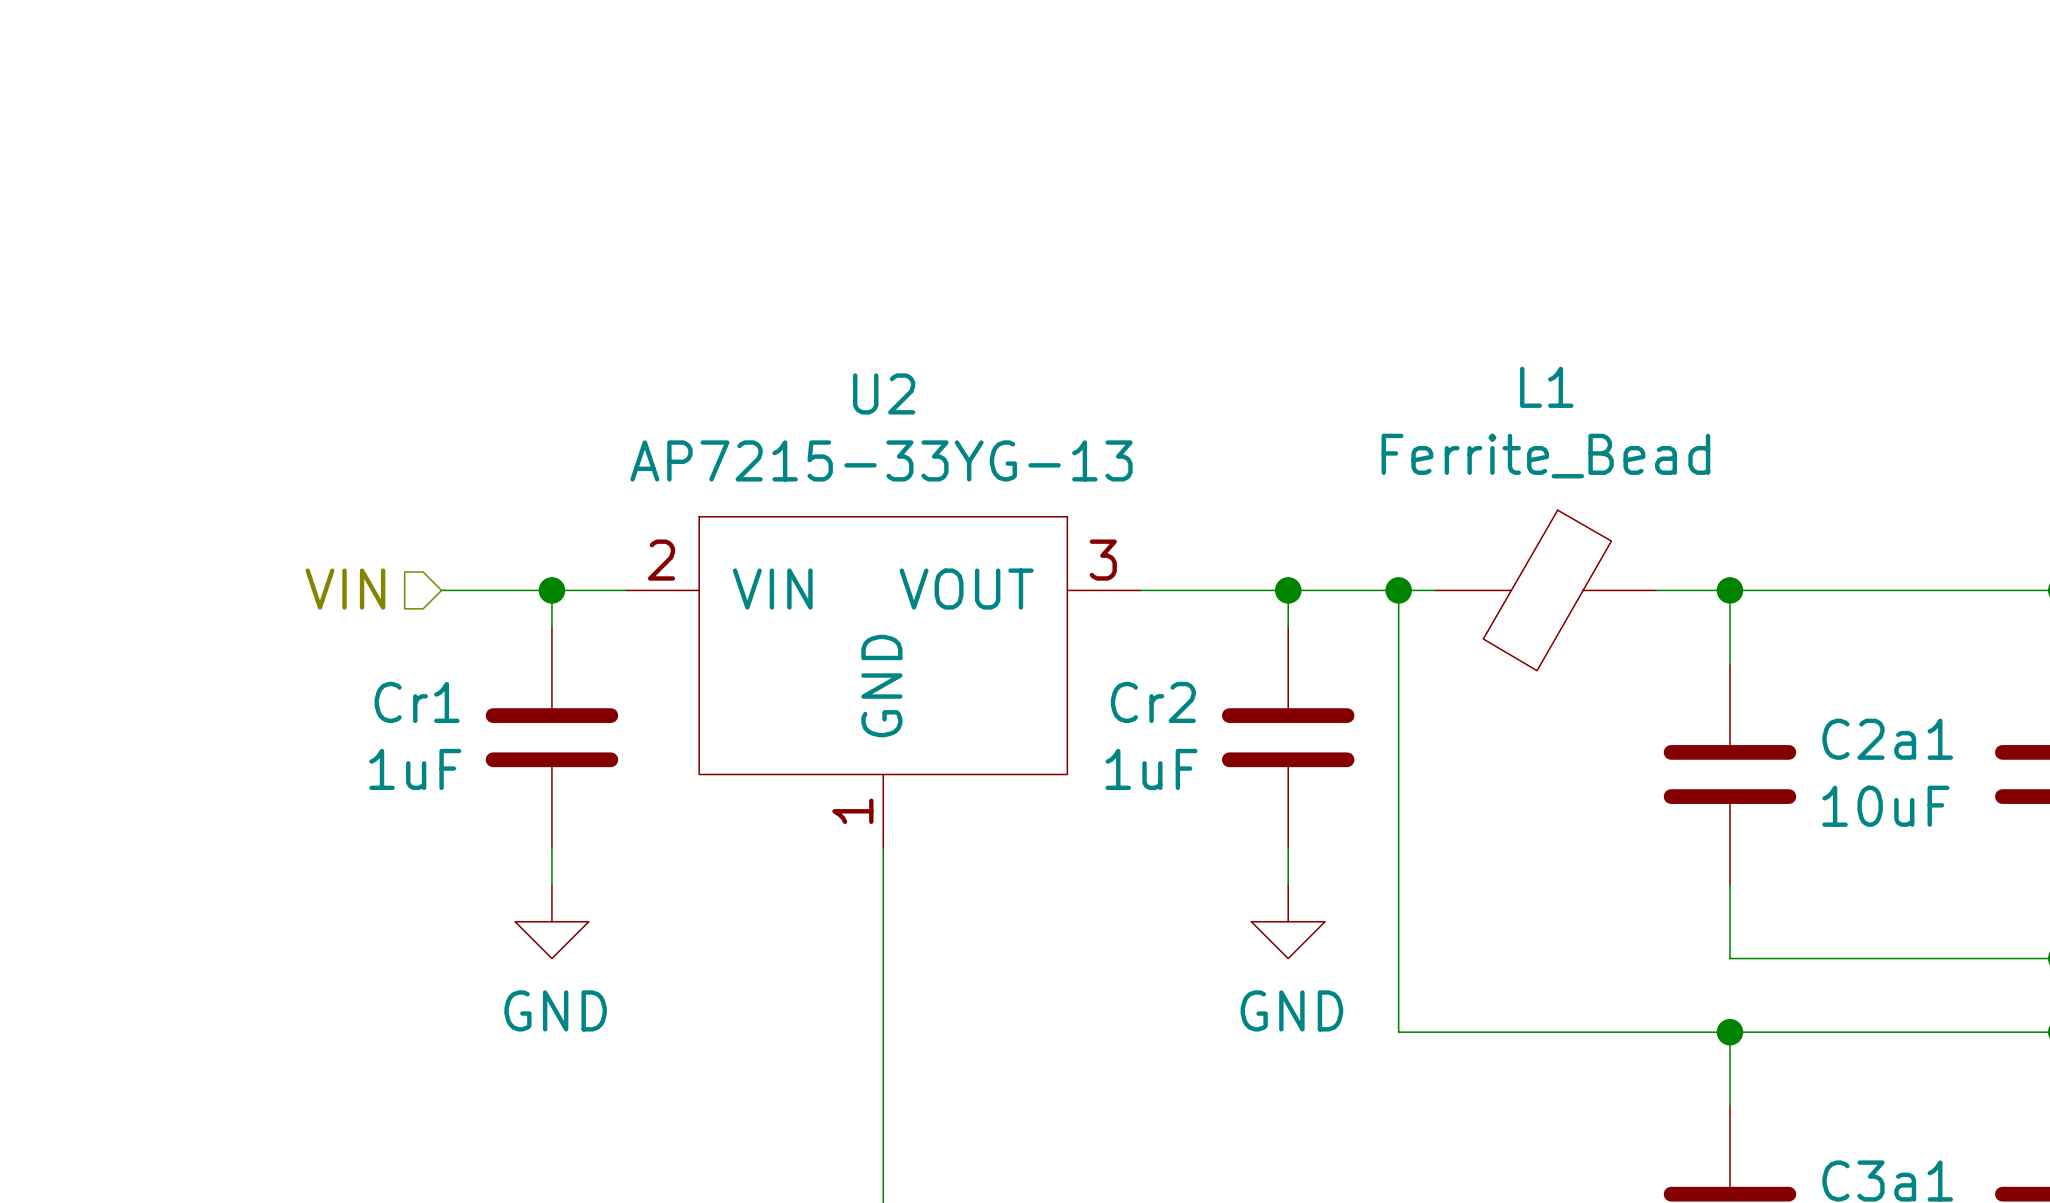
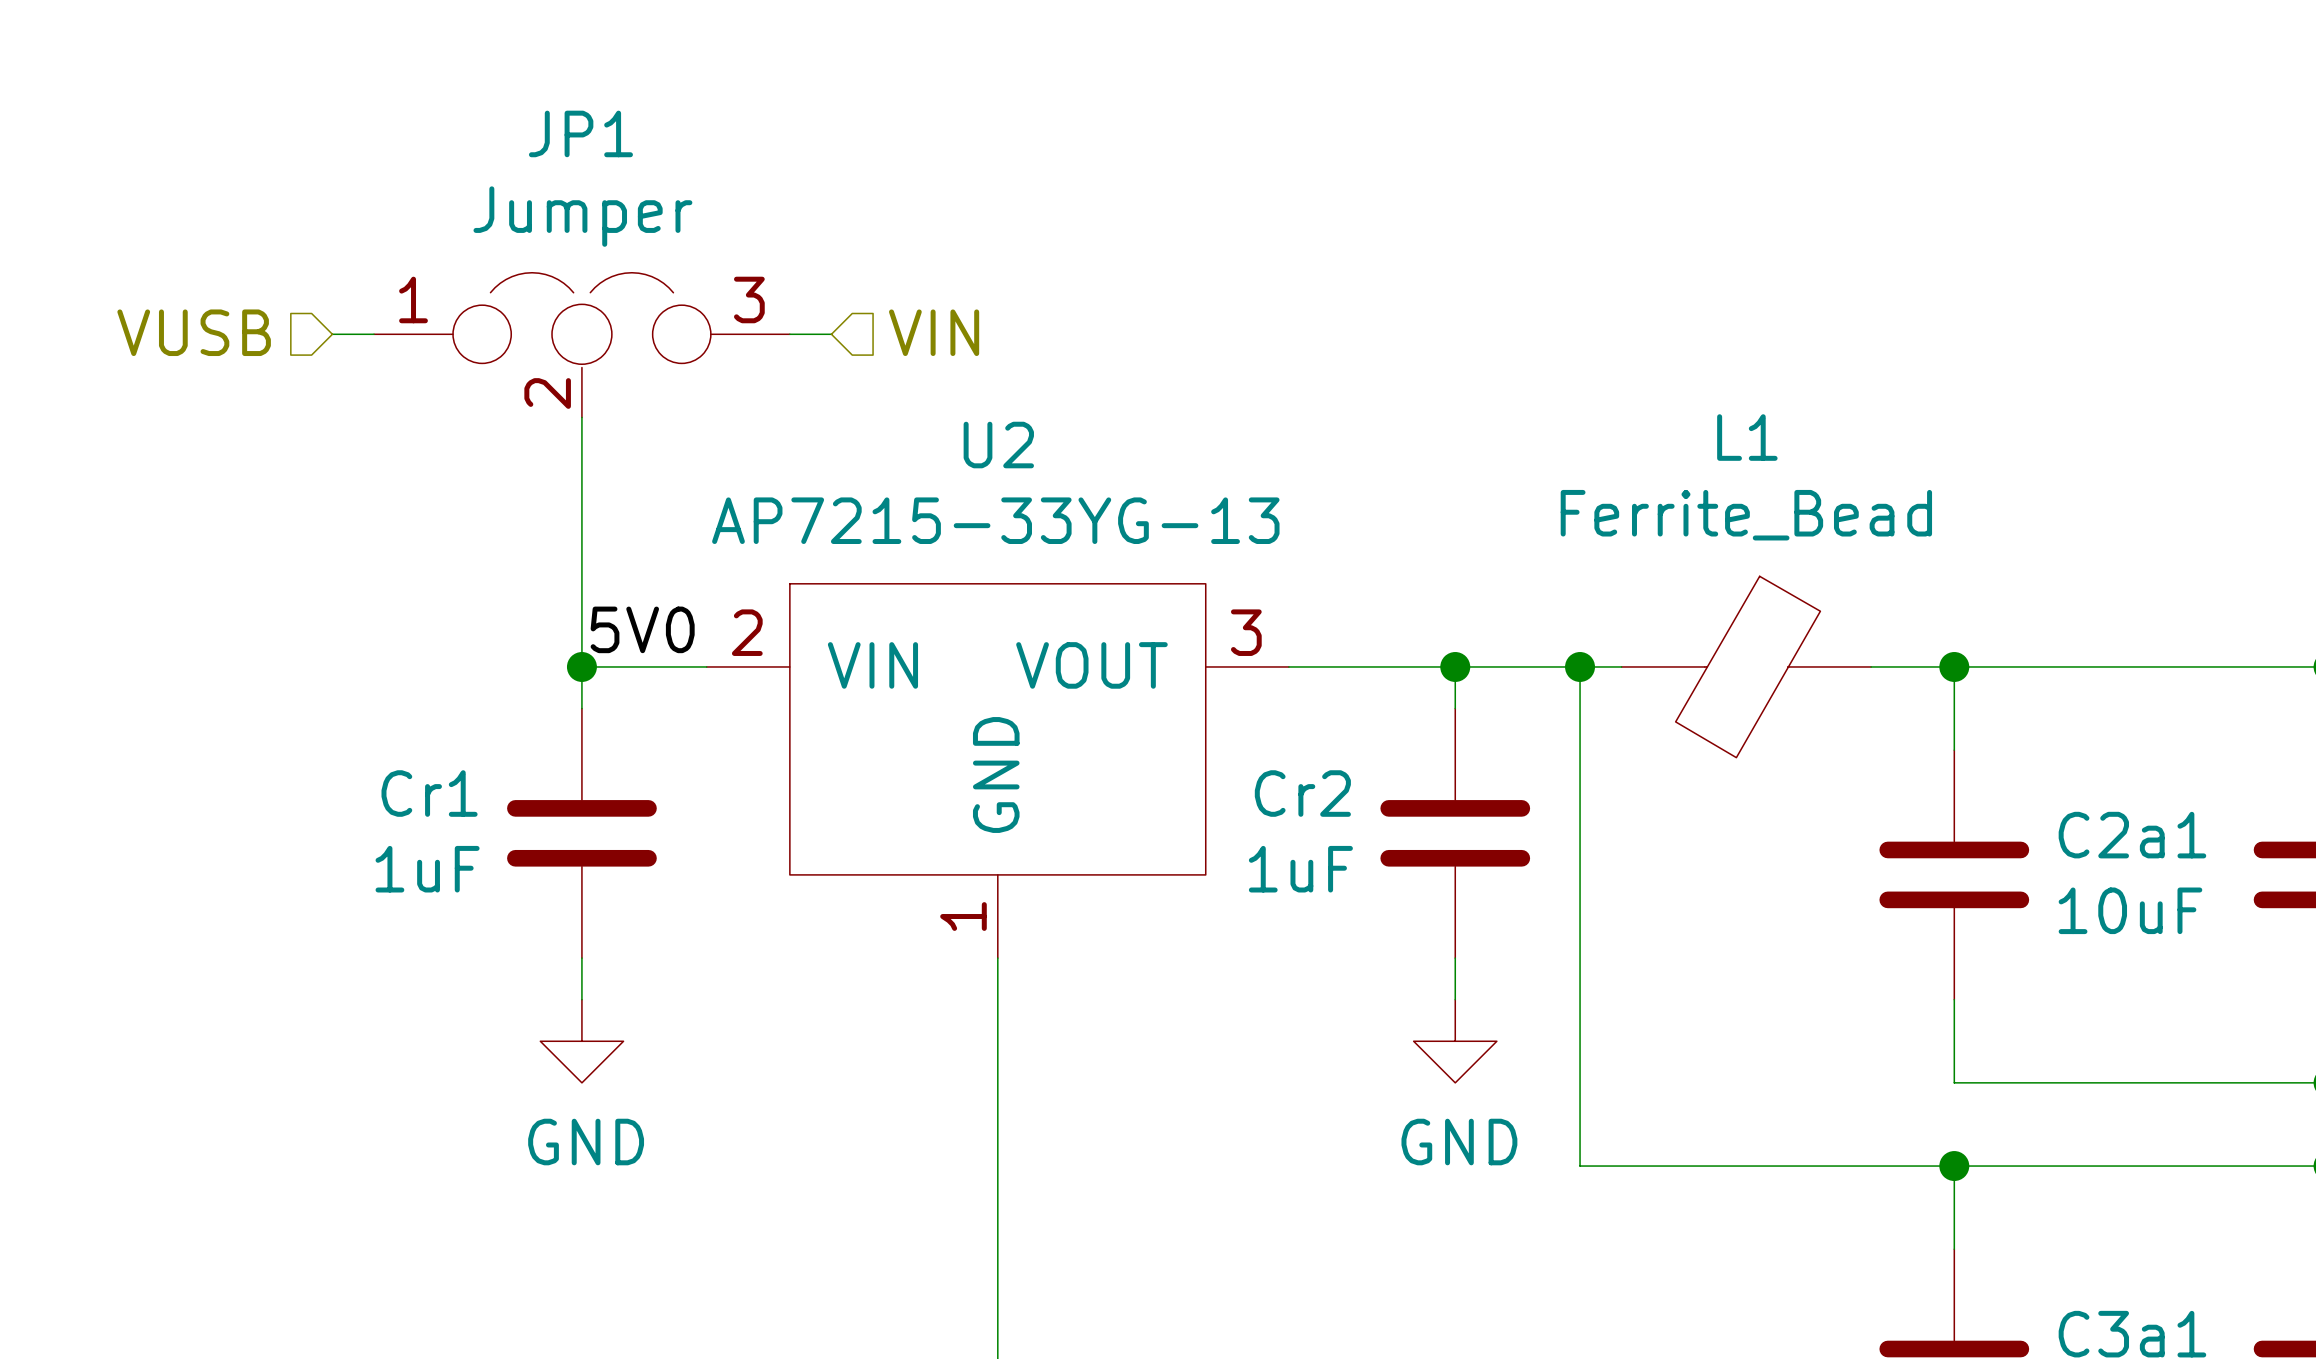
hierarchical label: none -> VUSB (194, 332)
wire: none -> (332, 334) (374, 334)
wire: none -> (789, 334) (831, 334)
JP1: none -> Jumper (581, 345)
wire: none -> (581, 417) (581, 708)
label: none -> 5V0 (642, 629)
hierarchical label rotation: 0° (345, 589) -> 180° (934, 332)
hierarchical label position: VIN (345, 589) -> VIN (934, 332)
wire: (441, 590) (515, 590) -> none
wire: (551, 590) (551, 627) -> none
junction position: (551, 590) -> (581, 666)
Cr1 position: (551, 737) -> (581, 833)
wire: (551, 848) (551, 884) -> (581, 958) (581, 999)
power symbol position: GND (551, 921) -> GND (581, 1041)

